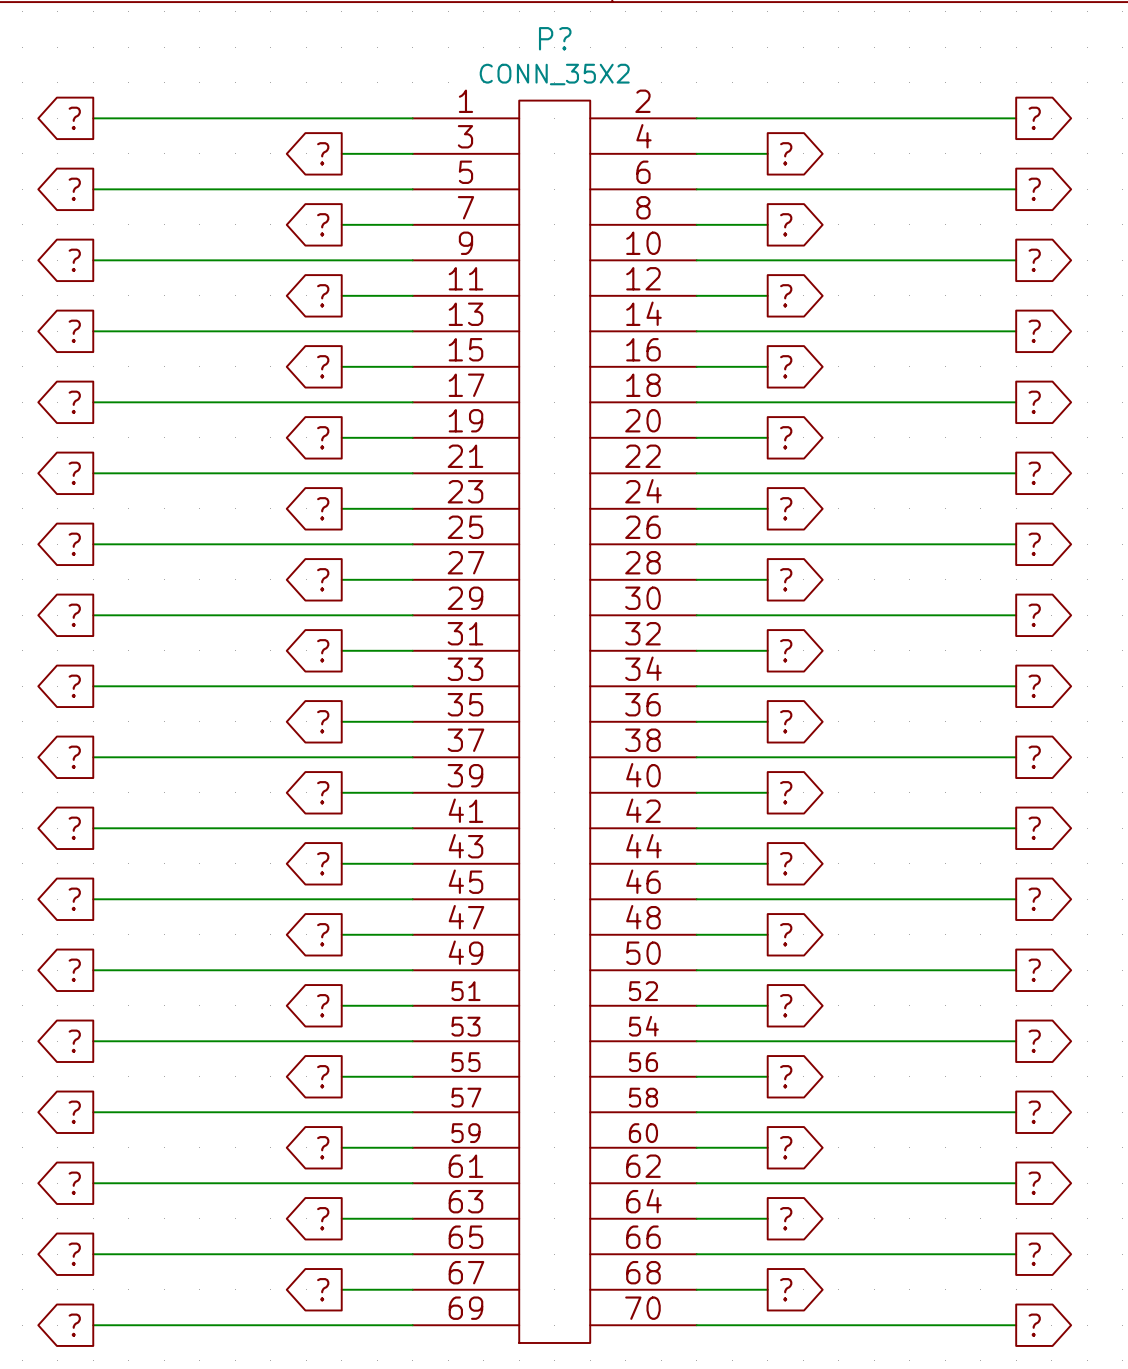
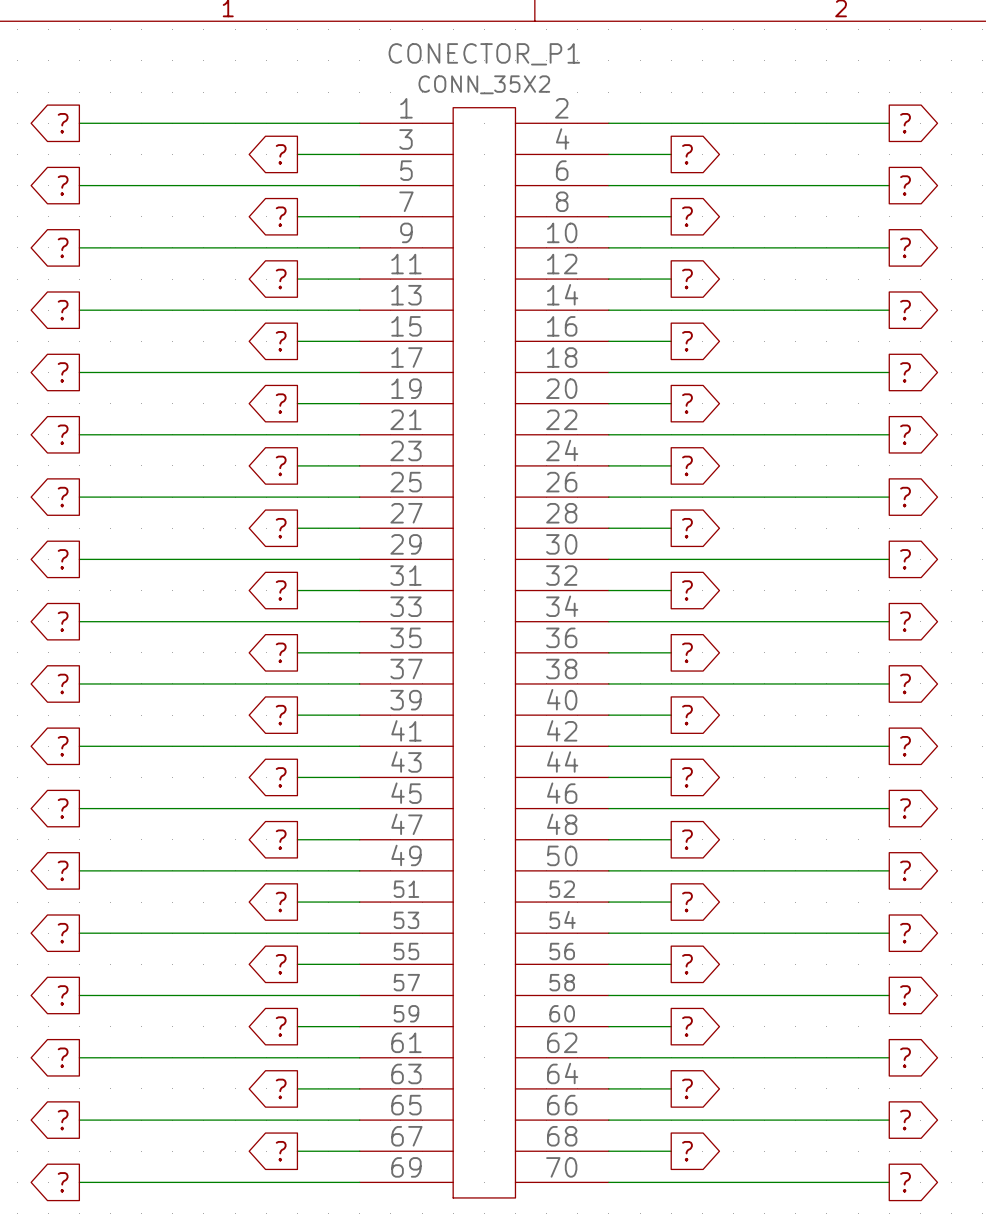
P? name: P? (555, 38) -> CONECTOR_P1 (484, 54)

